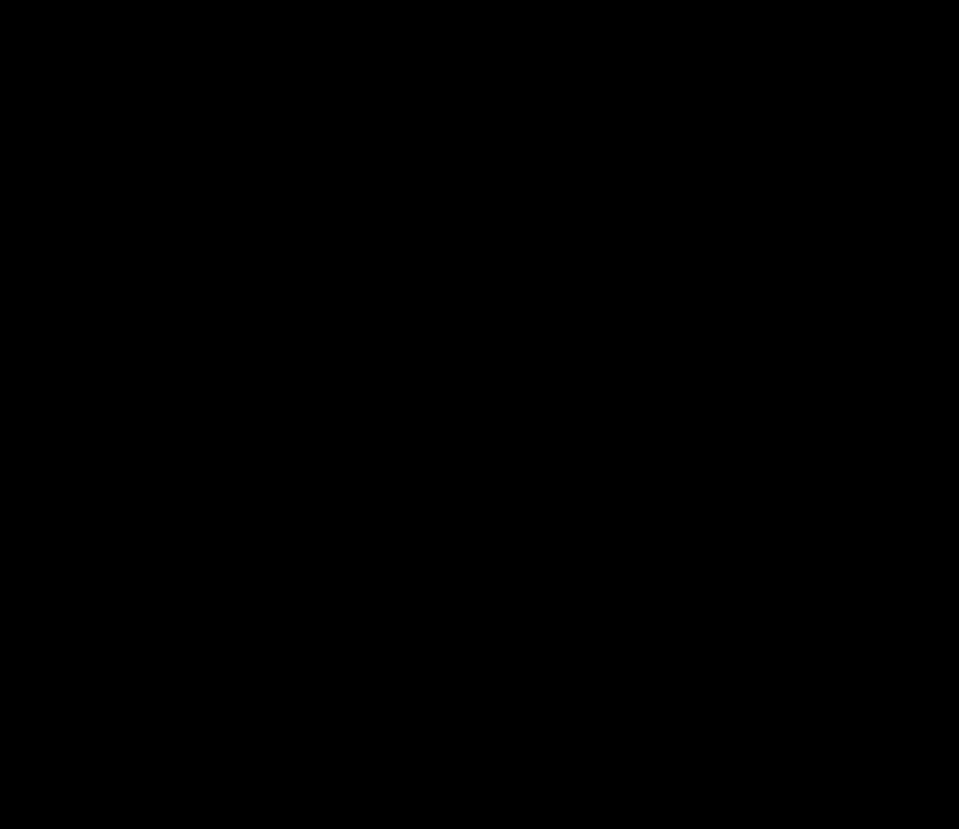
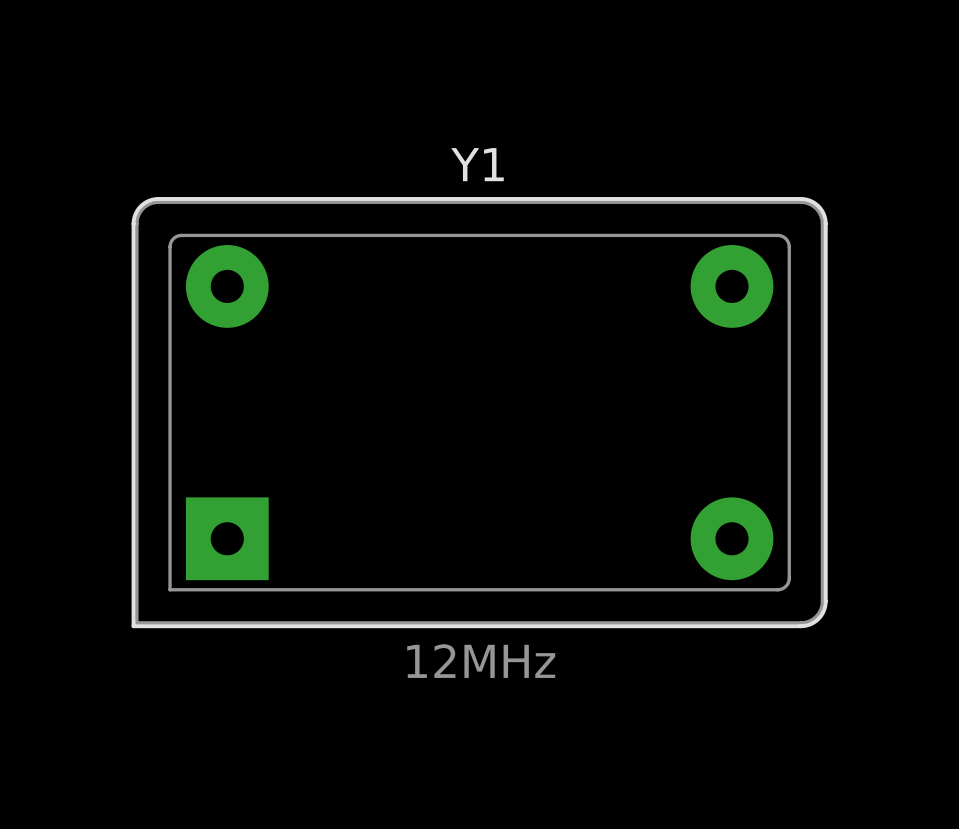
Y1: none -> 12MHz (479, 412)

